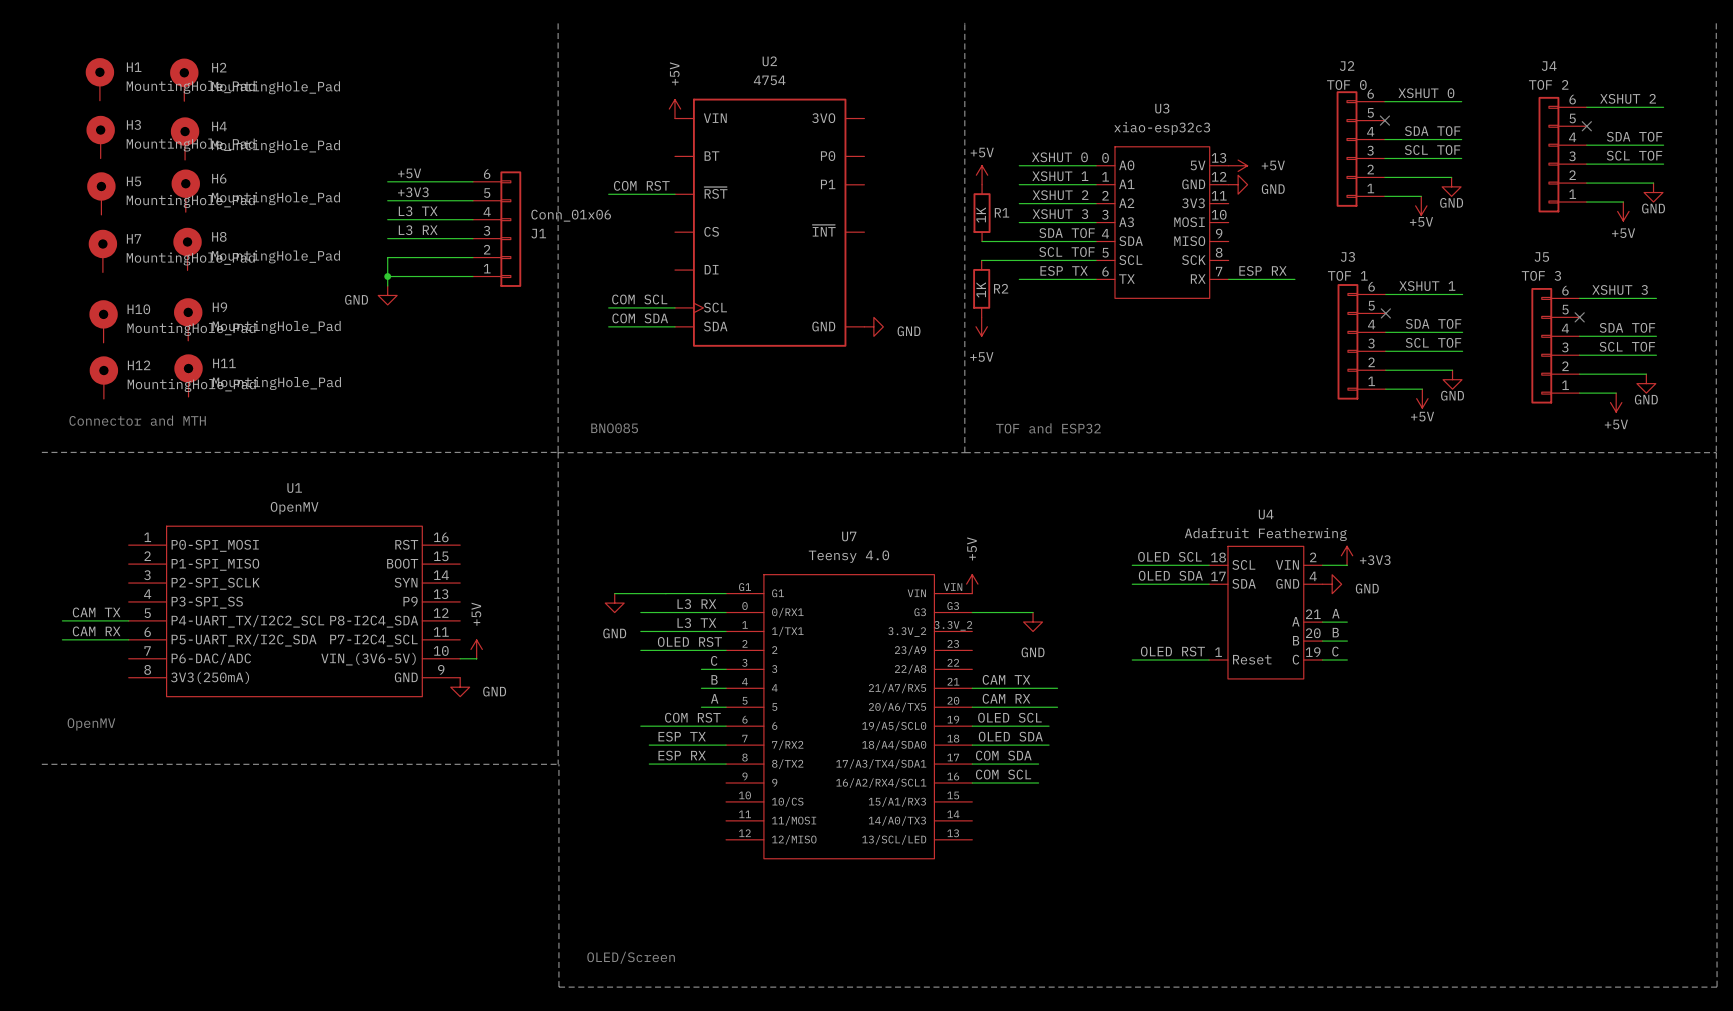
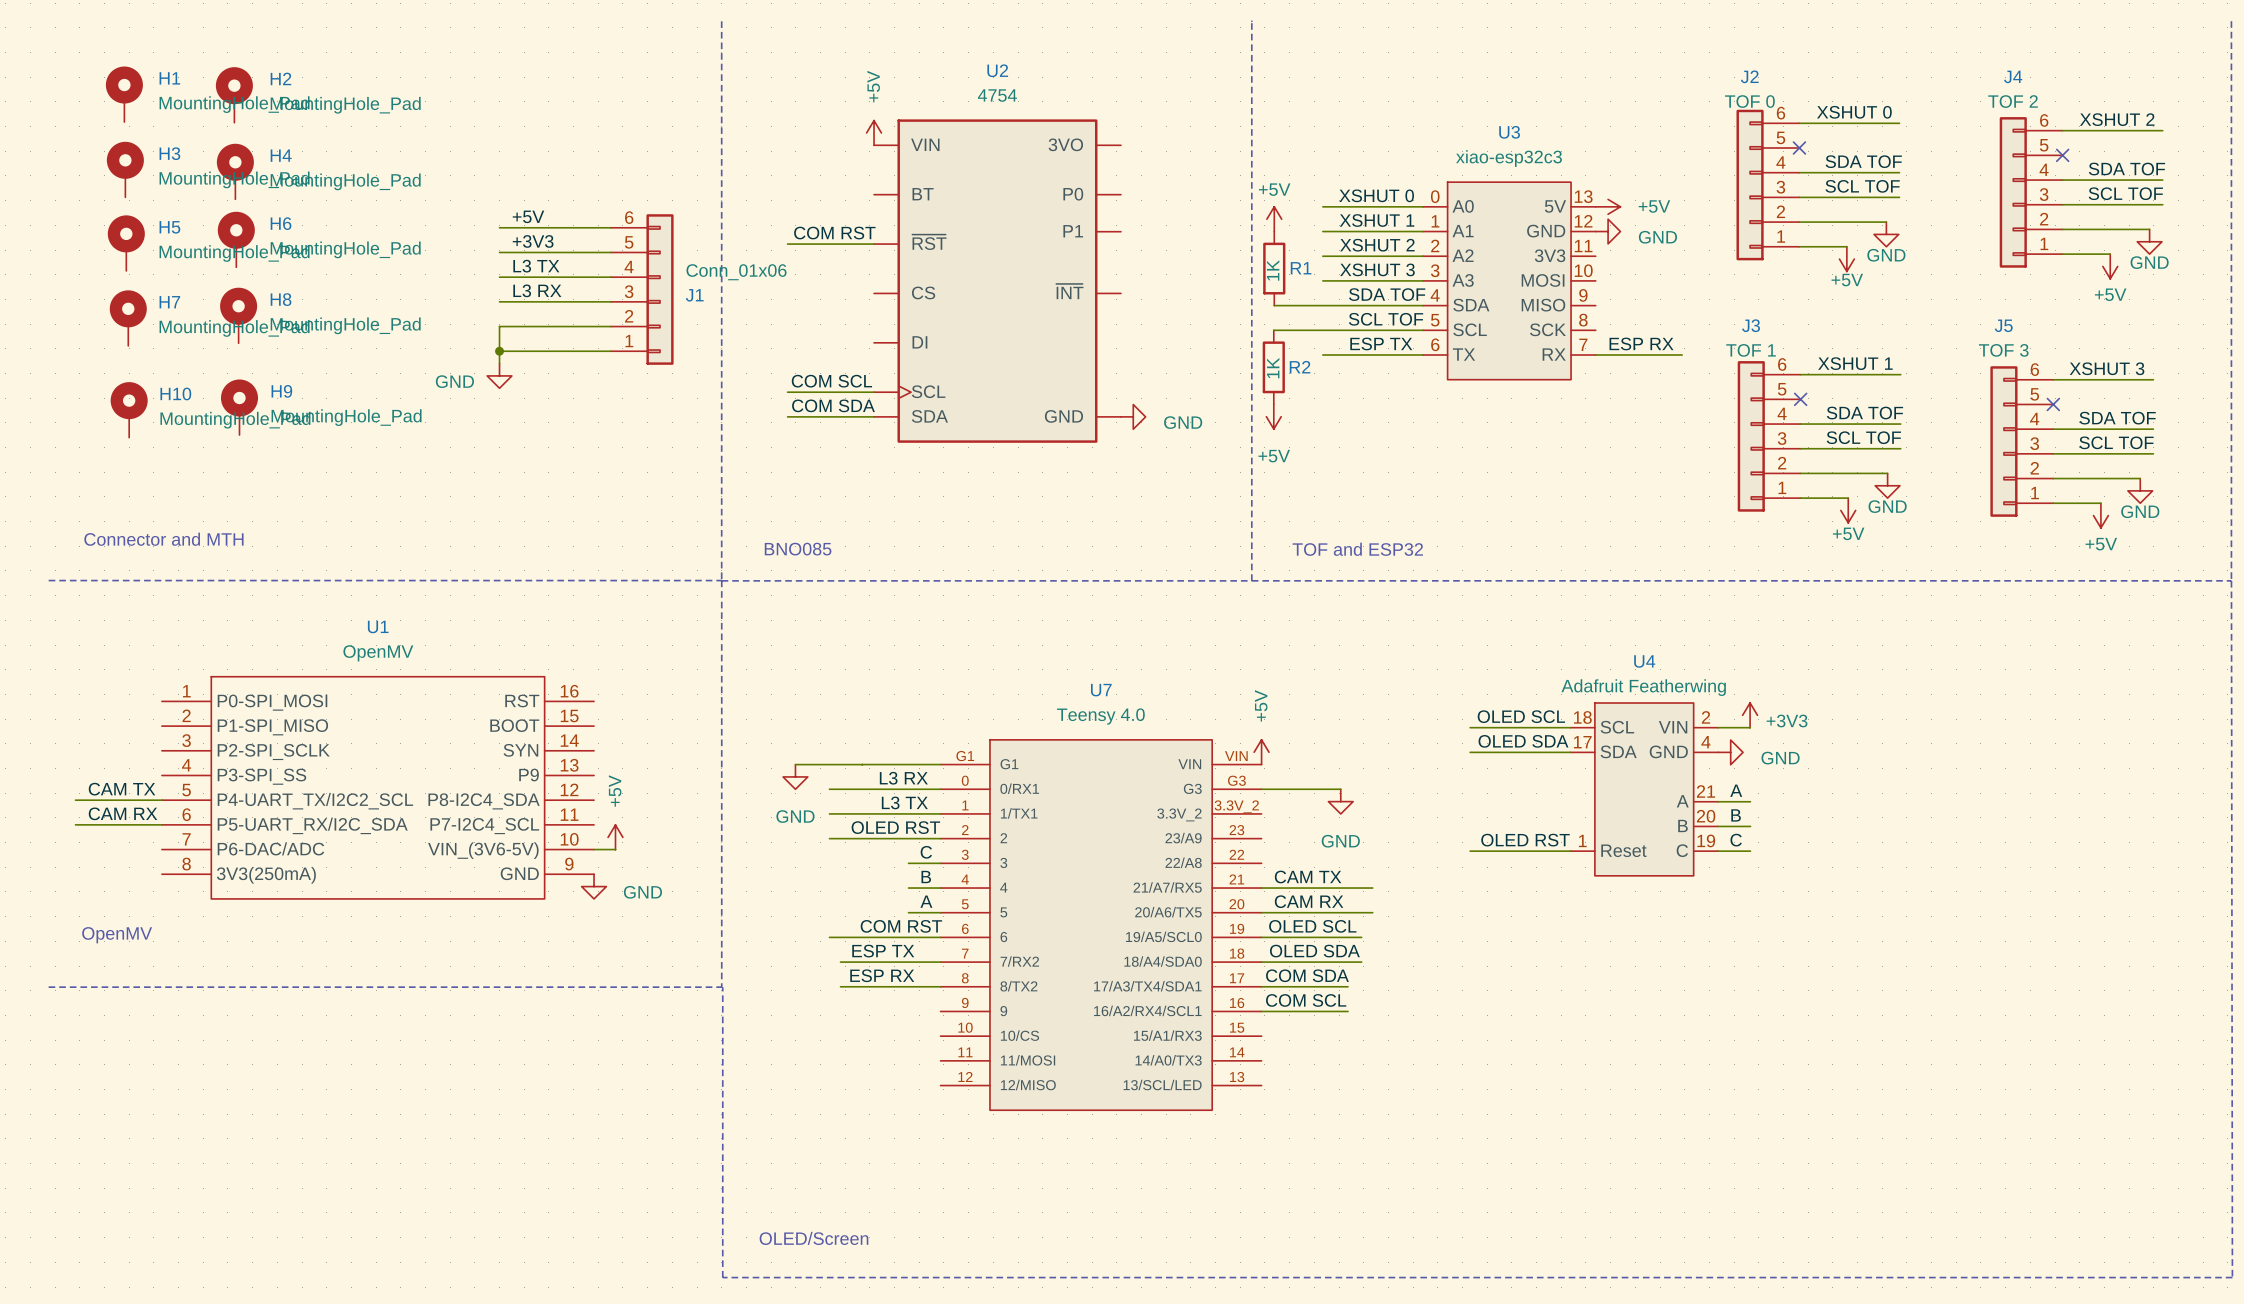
H11: MountingHole_Pad (188, 375) -> none
H12: MountingHole_Pad (103, 377) -> none

